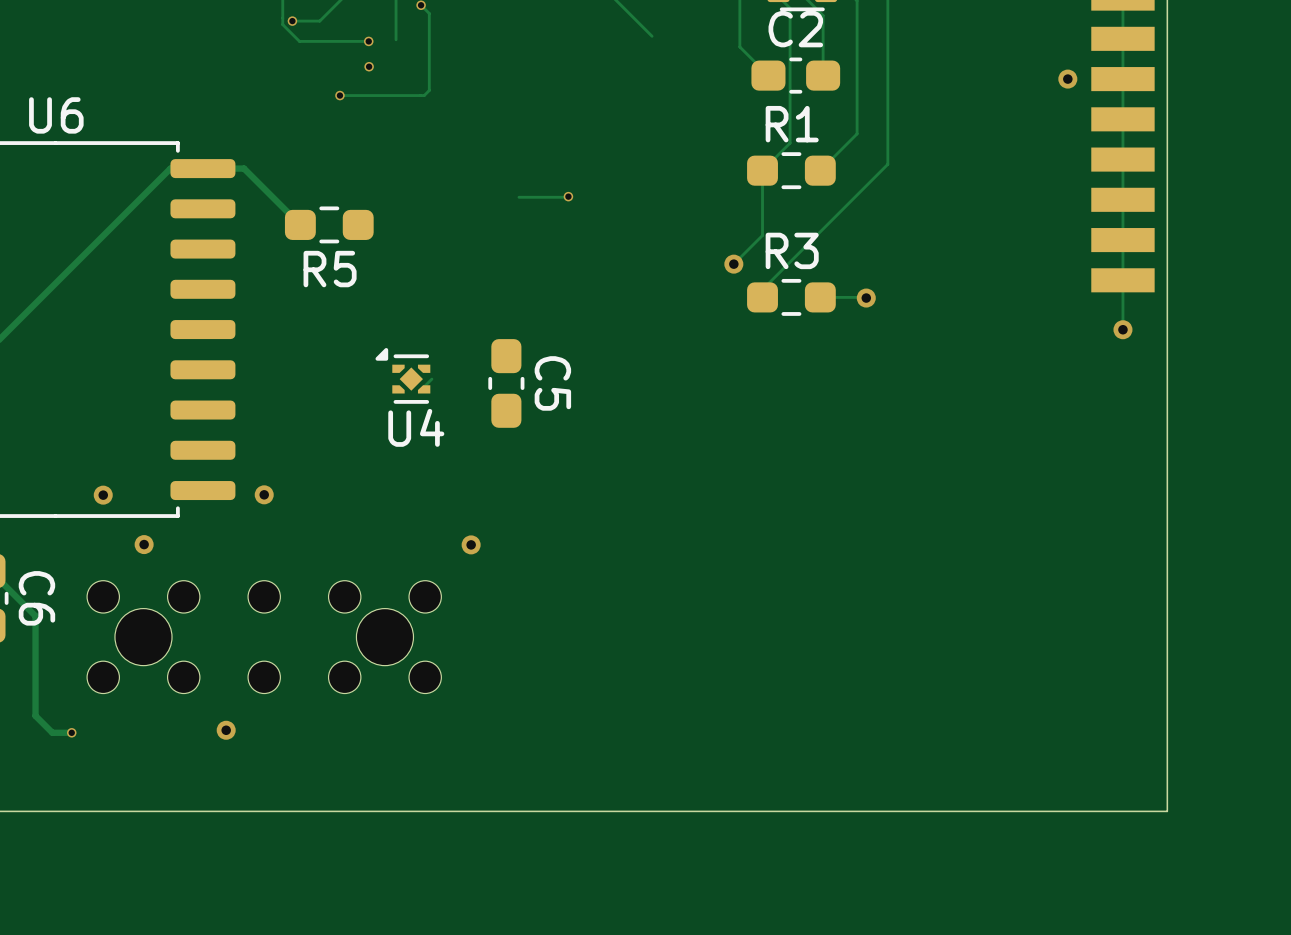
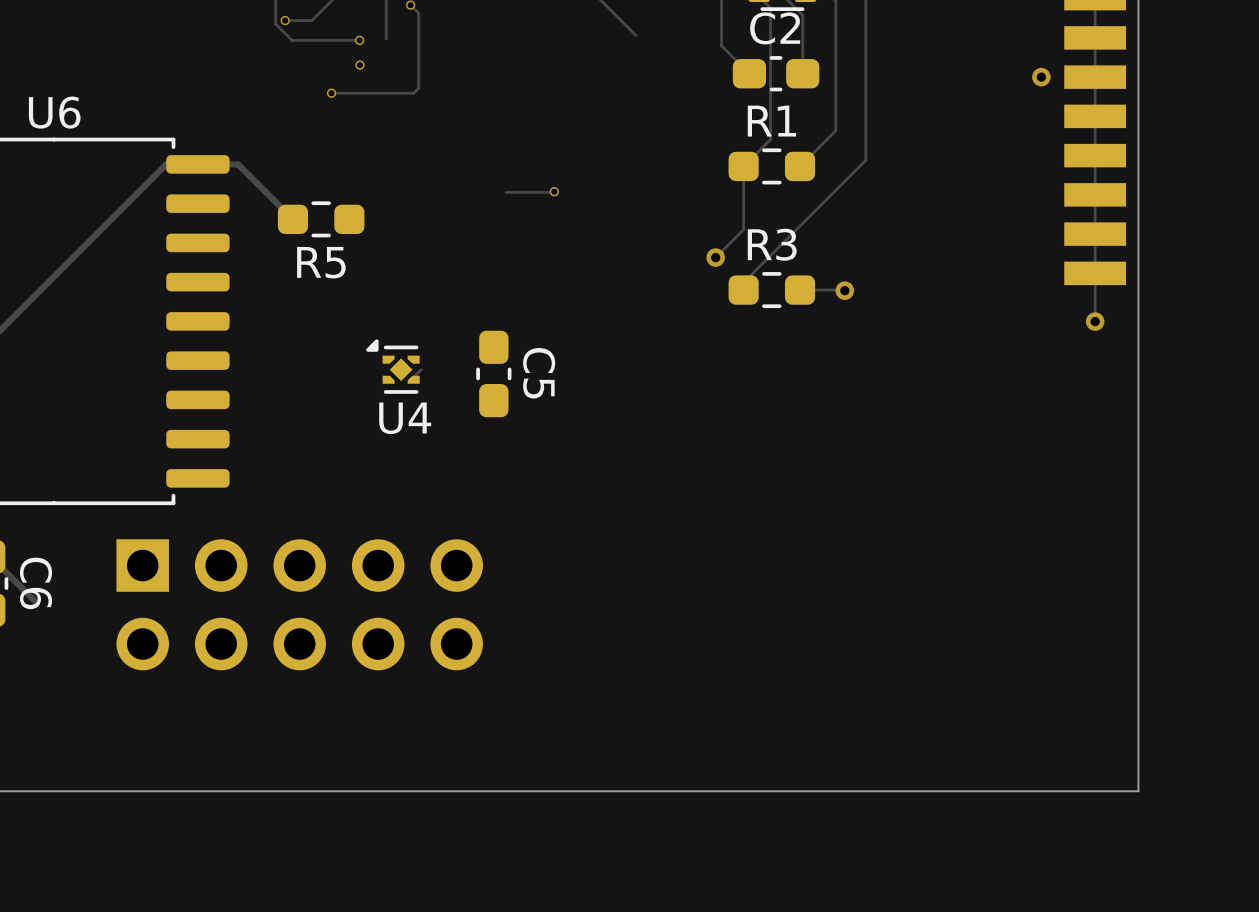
via: (264, 494) -> none
via: (103, 495) -> none
via: (144, 544) -> none
via: (471, 544) -> none
track: (35, 616) (35, 715) (52, 732) (71, 732) -> none
part: none -> (299, 604)
part: (264, 637) -> none
via: (226, 730) -> none
via: (71, 732) -> none

